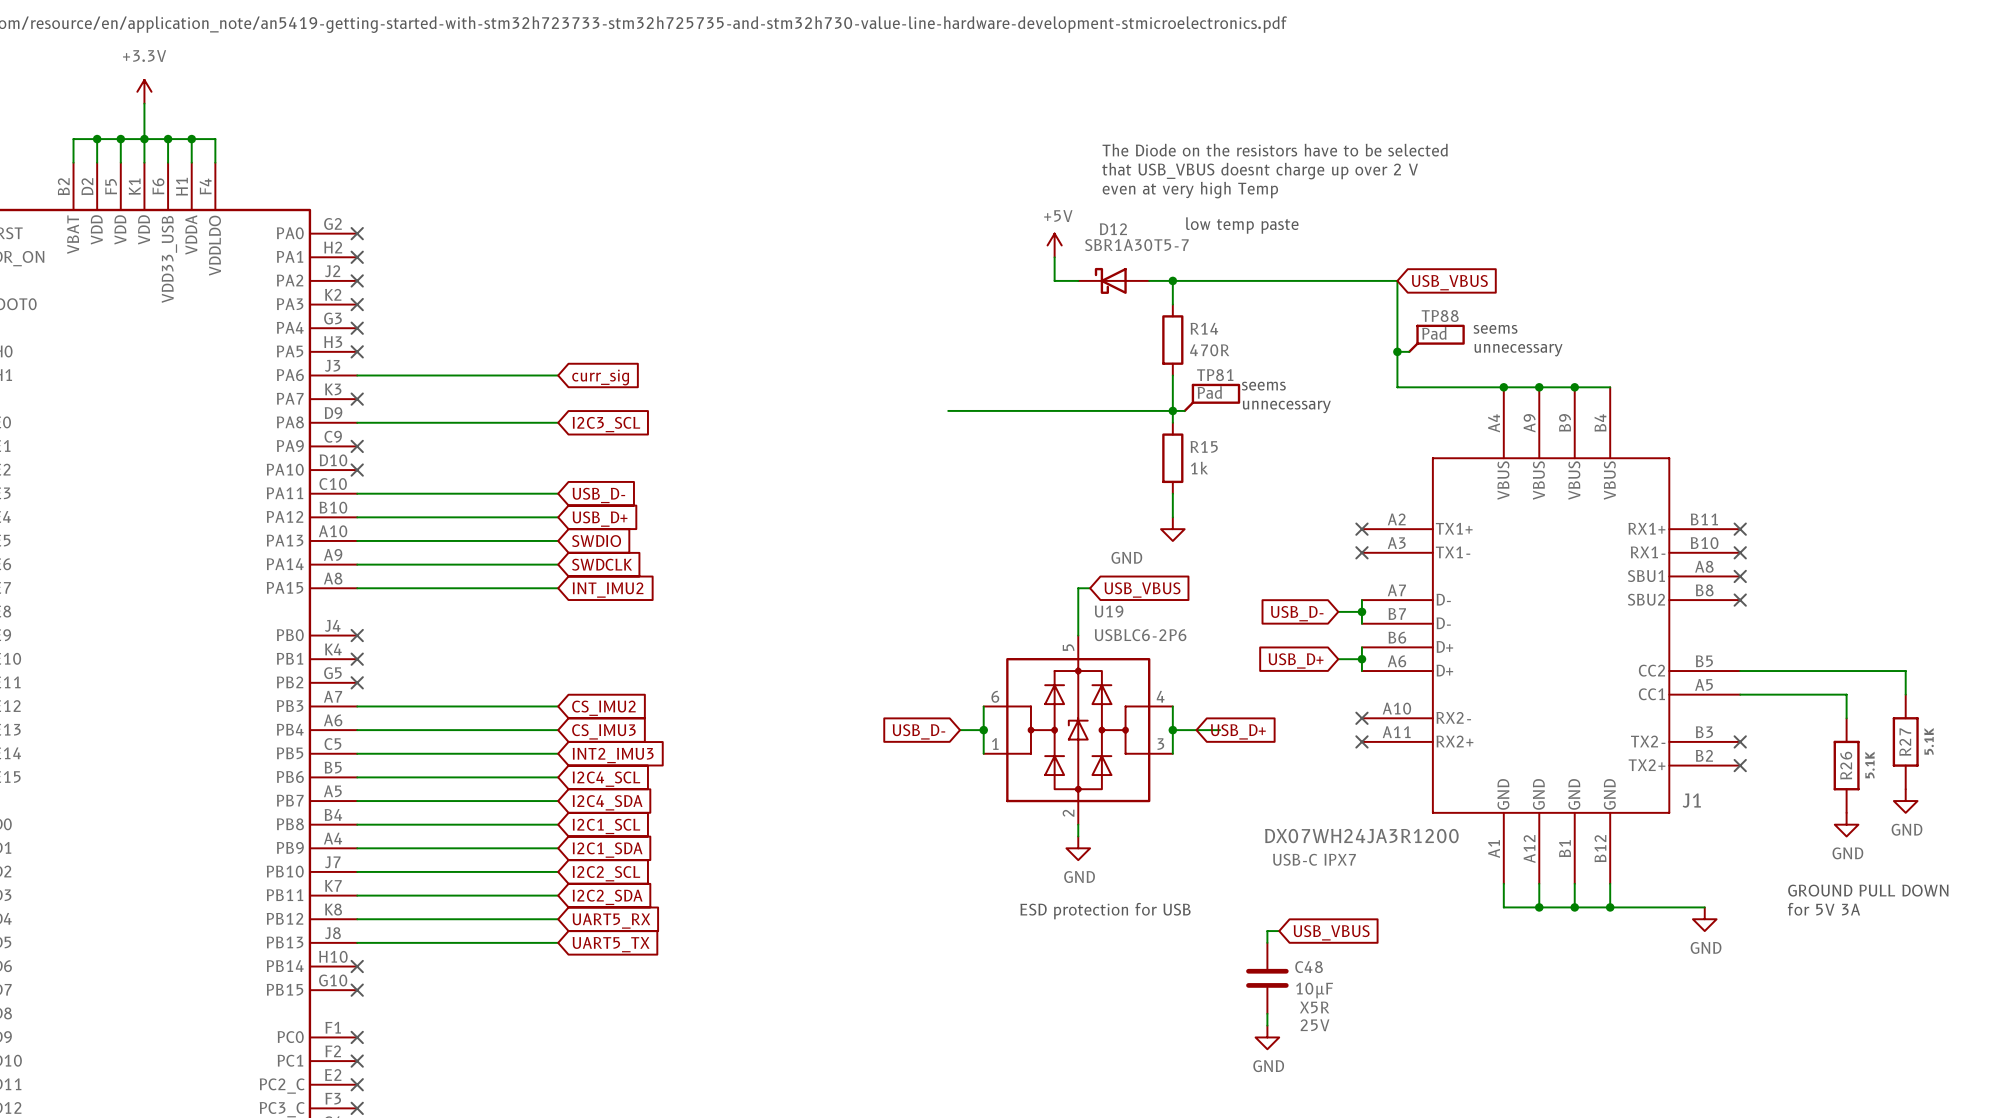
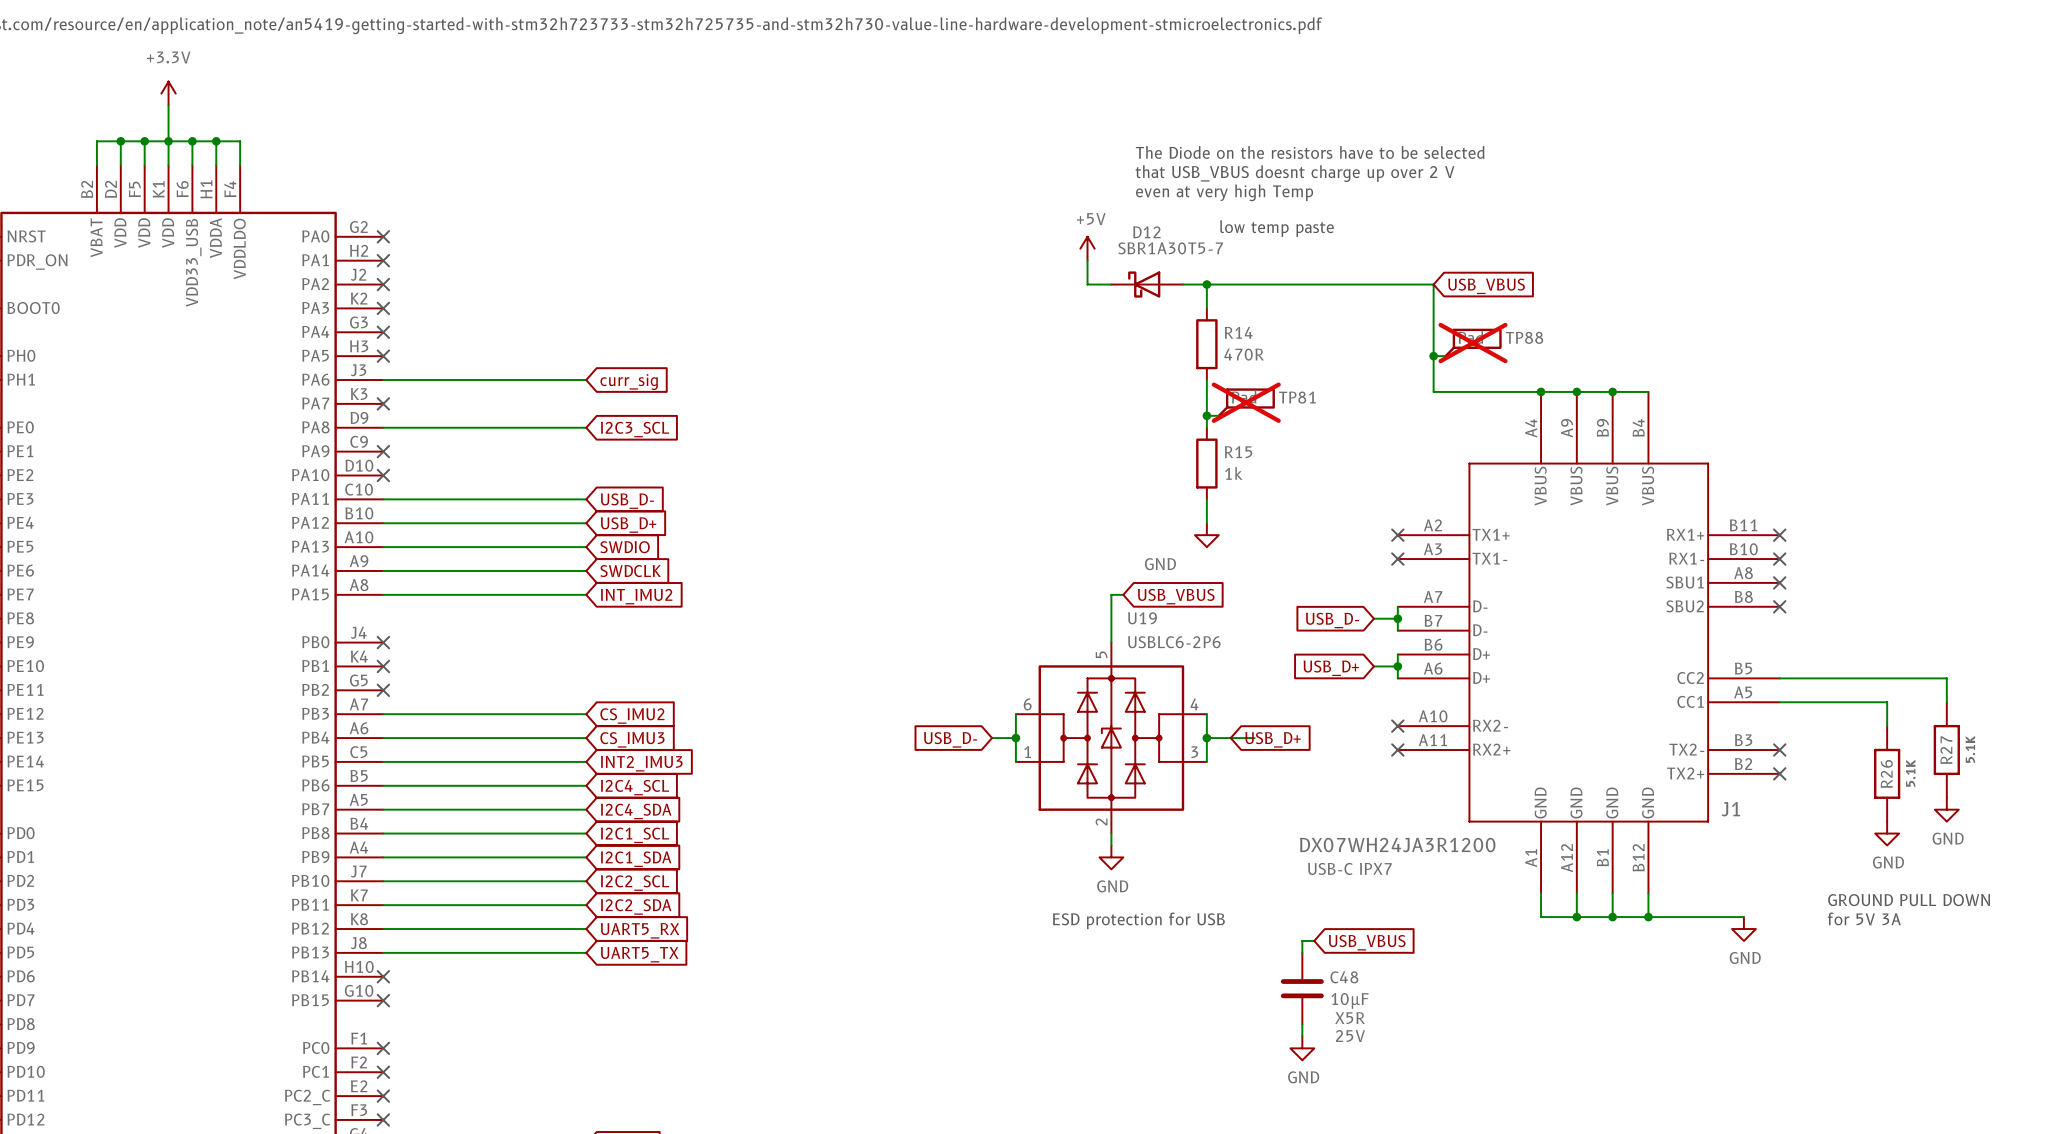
TP88 name position: TP88 (1440, 316) -> TP88 (1524, 337)
text: seems (1495, 329) -> none
TP88 do-not-place cross: none -> (1473, 343)
text: unnecessary (1518, 350) -> none
TP81 name position: TP81 (1215, 375) -> TP81 (1297, 397)
text: seems (1263, 386) -> none
TP81 do-not-place cross: none -> (1246, 402)
text: unnecessary (1286, 406) -> none
wire: (948, 410) (1172, 410) -> none

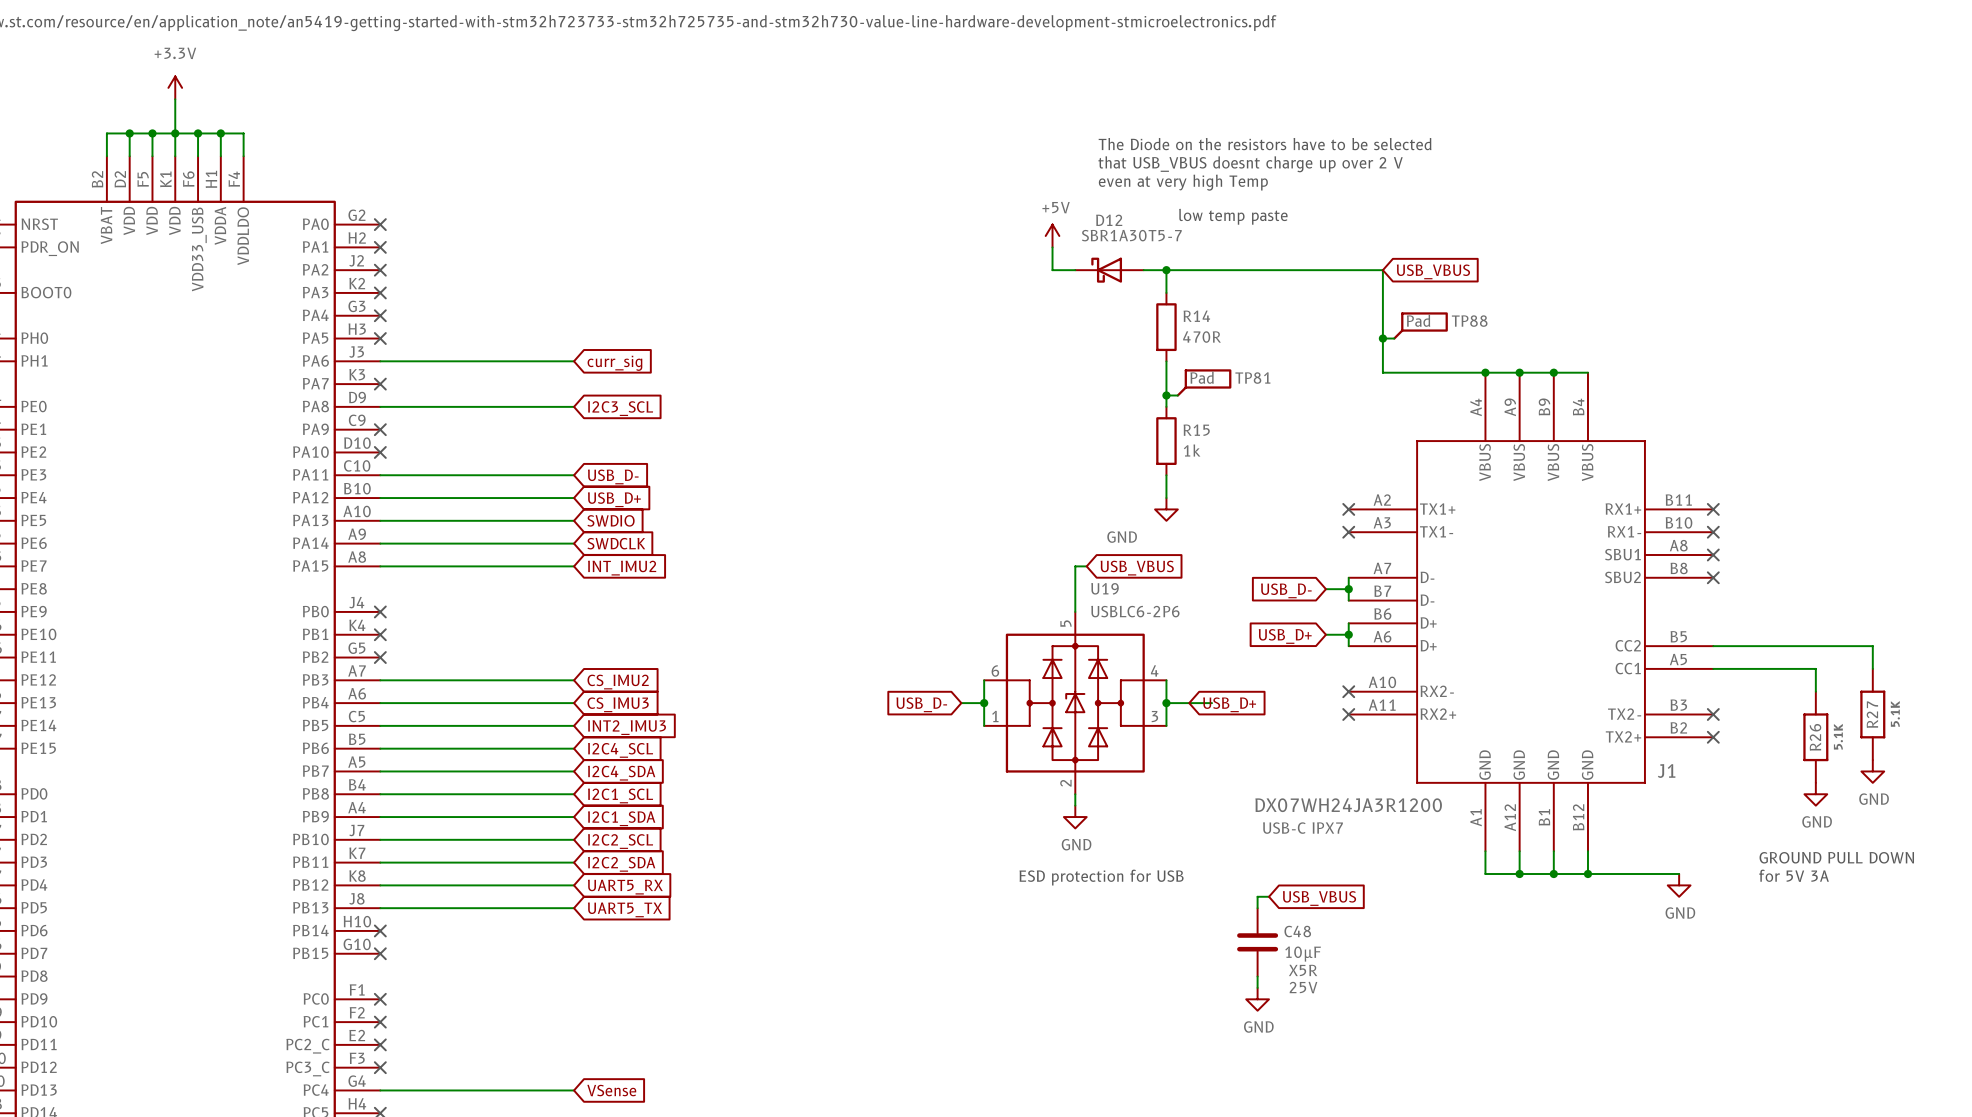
TP88 do-not-place cross: (1473, 343) -> none
TP81 do-not-place cross: (1246, 402) -> none

